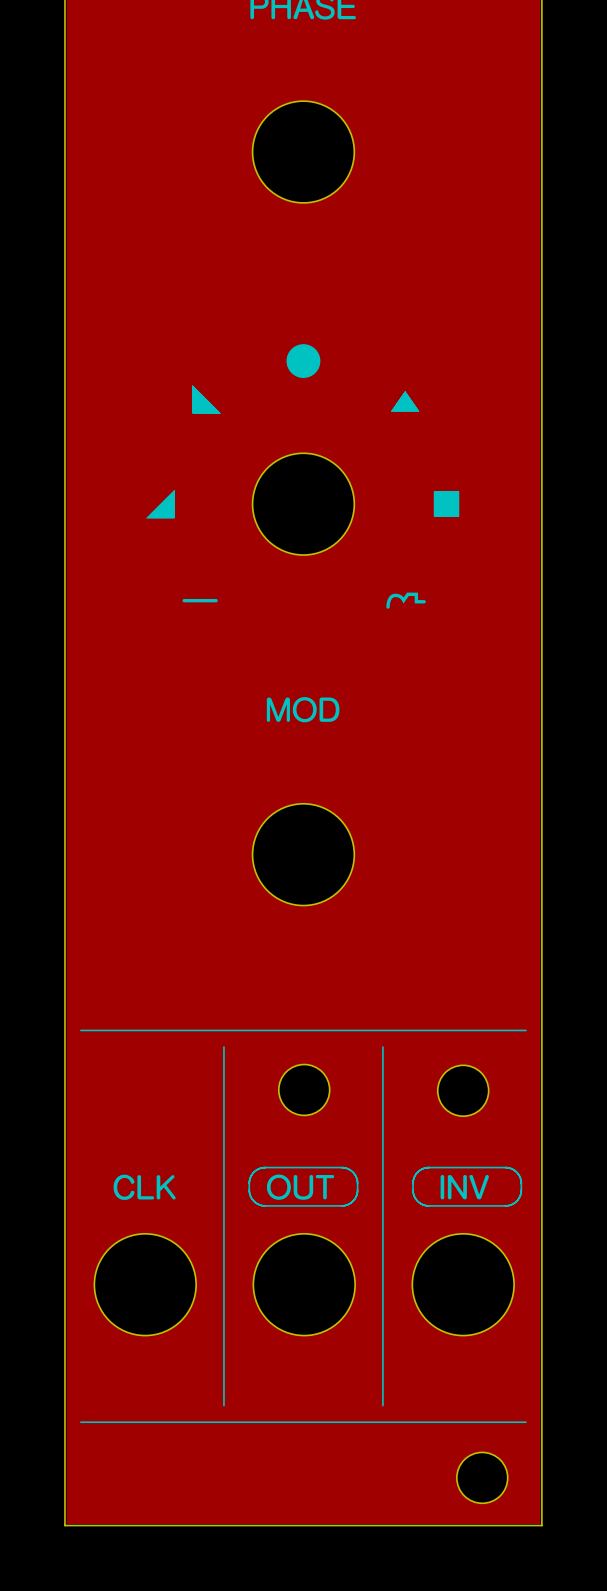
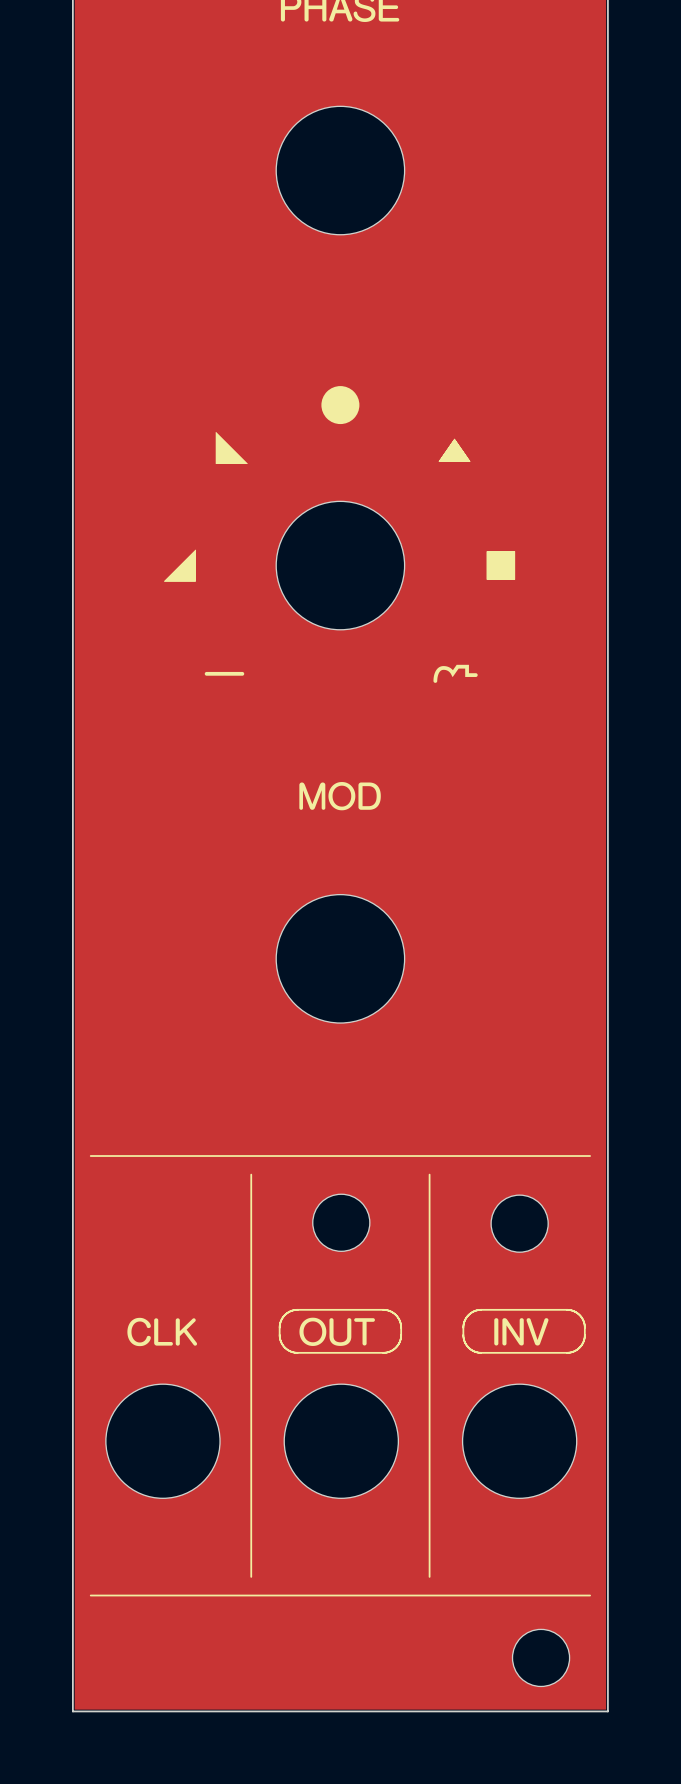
part footprint: [252, 101, 355, 203] -> [276, 106, 405, 235]
part footprint: [252, 453, 355, 556] -> [276, 501, 405, 630]
part footprint: [252, 803, 355, 906] -> [276, 894, 405, 1024]

